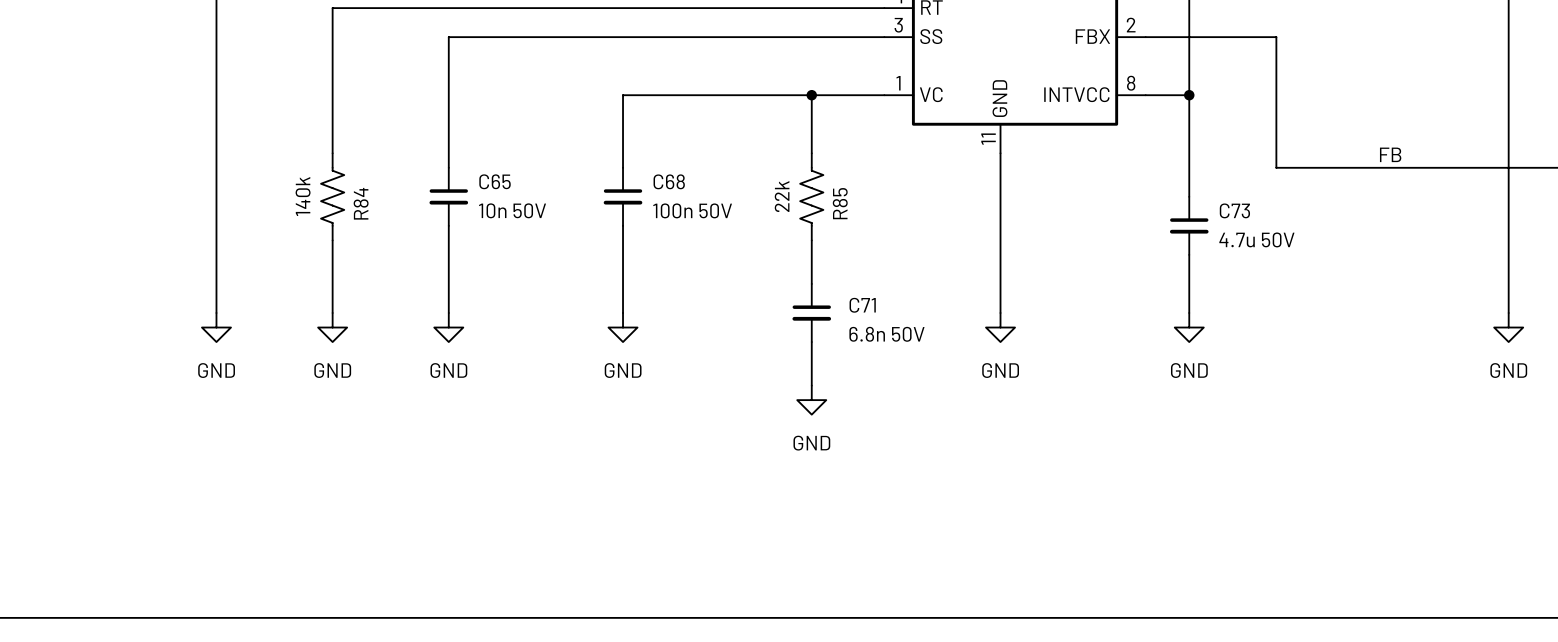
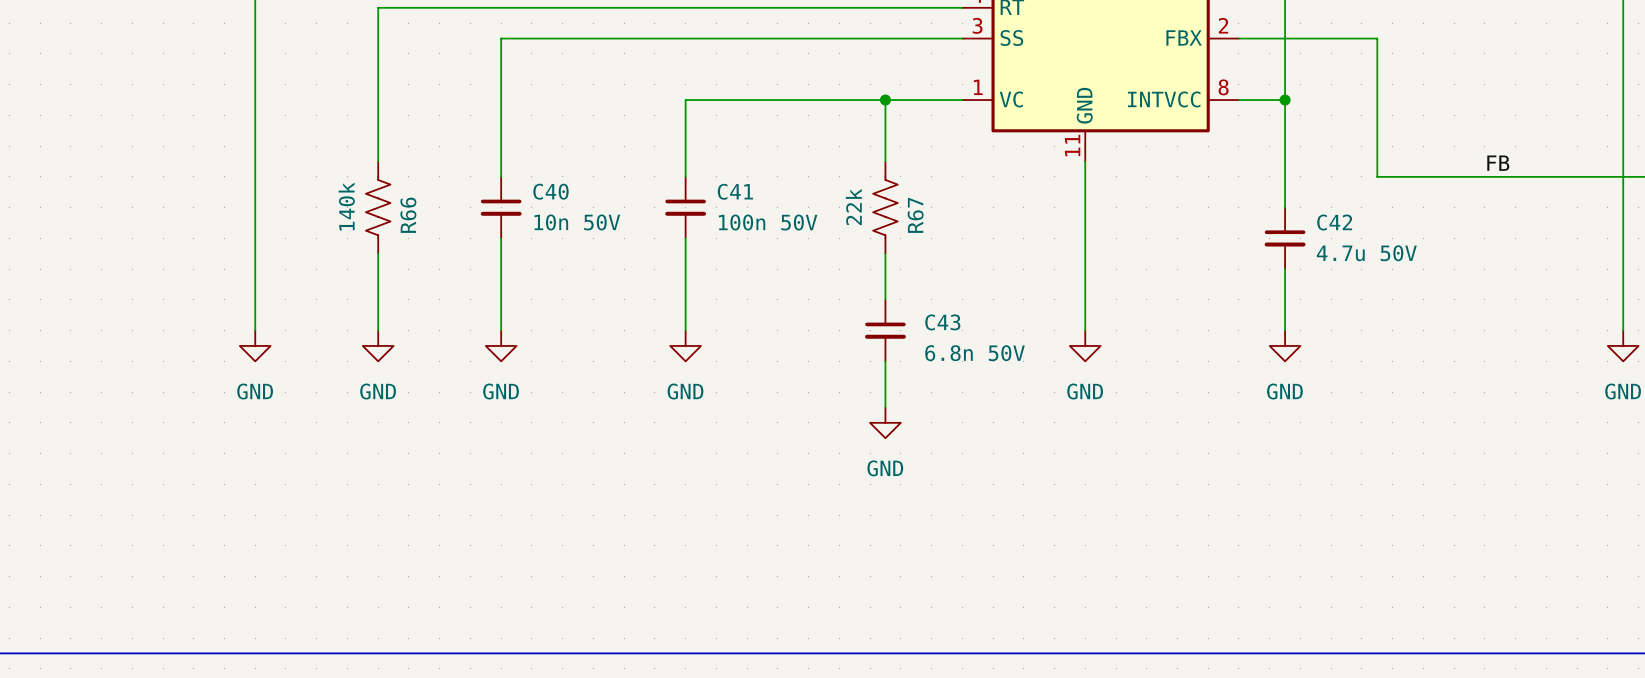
C65 name: C65 (495, 181) -> C40 (550, 191)
C68 name: C68 (669, 181) -> C41 (735, 191)
R84 name: R84 (361, 203) -> R66 (408, 215)
R85 name: R85 (840, 203) -> R67 (915, 215)
C73 name: C73 (1234, 210) -> C42 (1334, 222)
C71 name: C71 (862, 305) -> C43 (942, 322)

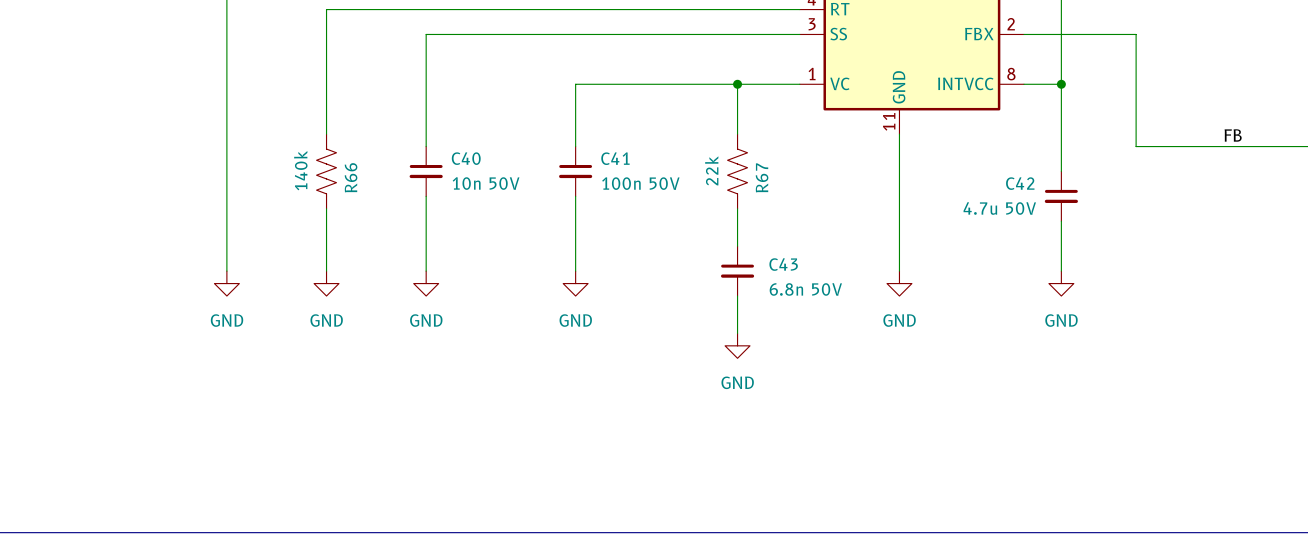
C42 name position: C42 (1334, 222) -> C42 (1020, 183)
C42 value position: 4.7u 50V (1366, 253) -> 4.7u 50V (999, 208)

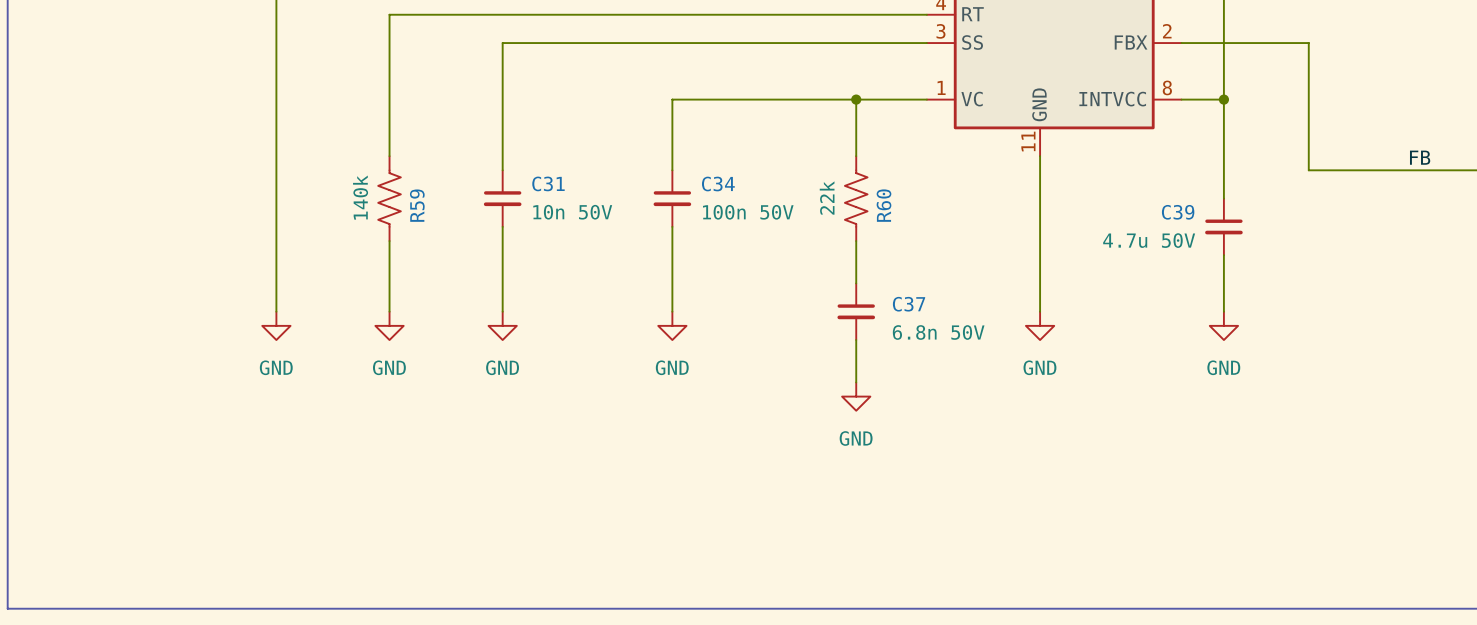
C40 name: C40 (466, 158) -> C31 (548, 183)
C41 name: C41 (615, 158) -> C34 (718, 184)
R66 name: R66 (351, 177) -> R59 (417, 205)
R67 name: R67 (762, 177) -> R60 (883, 205)
C42 name: C42 (1020, 183) -> C39 (1178, 212)
C43 name: C43 (783, 264) -> C37 (909, 304)

